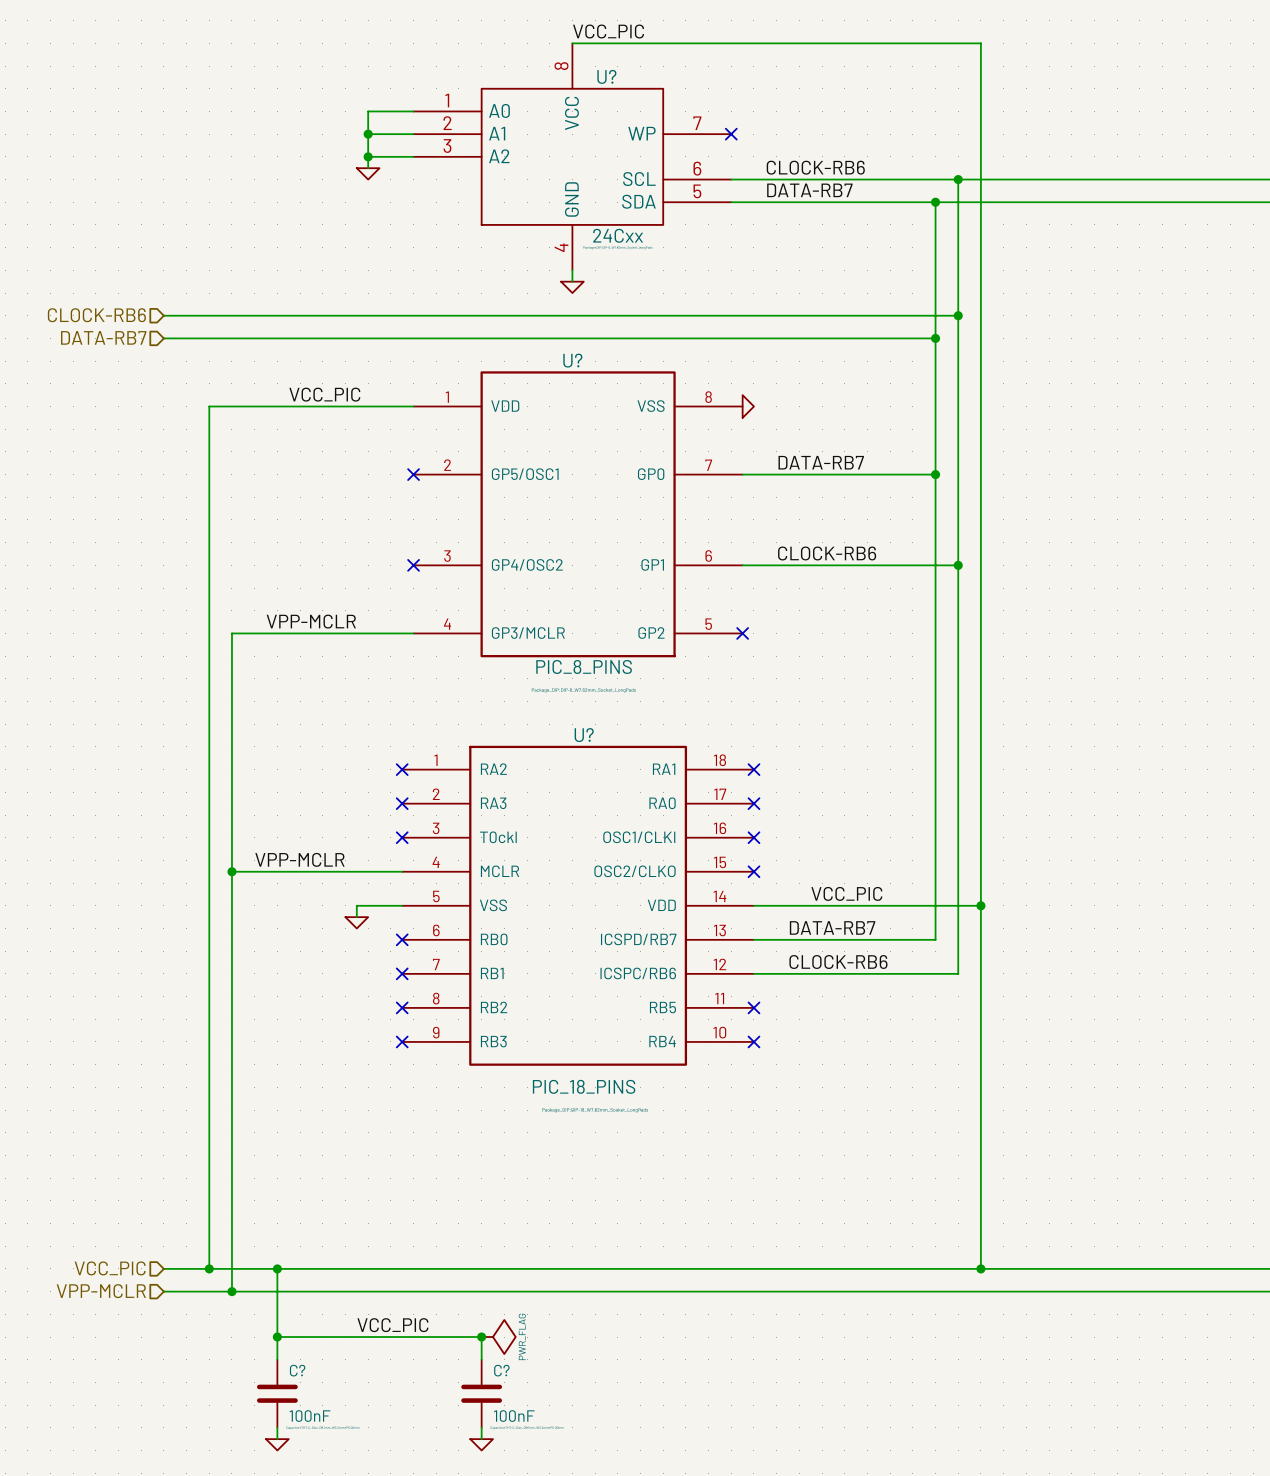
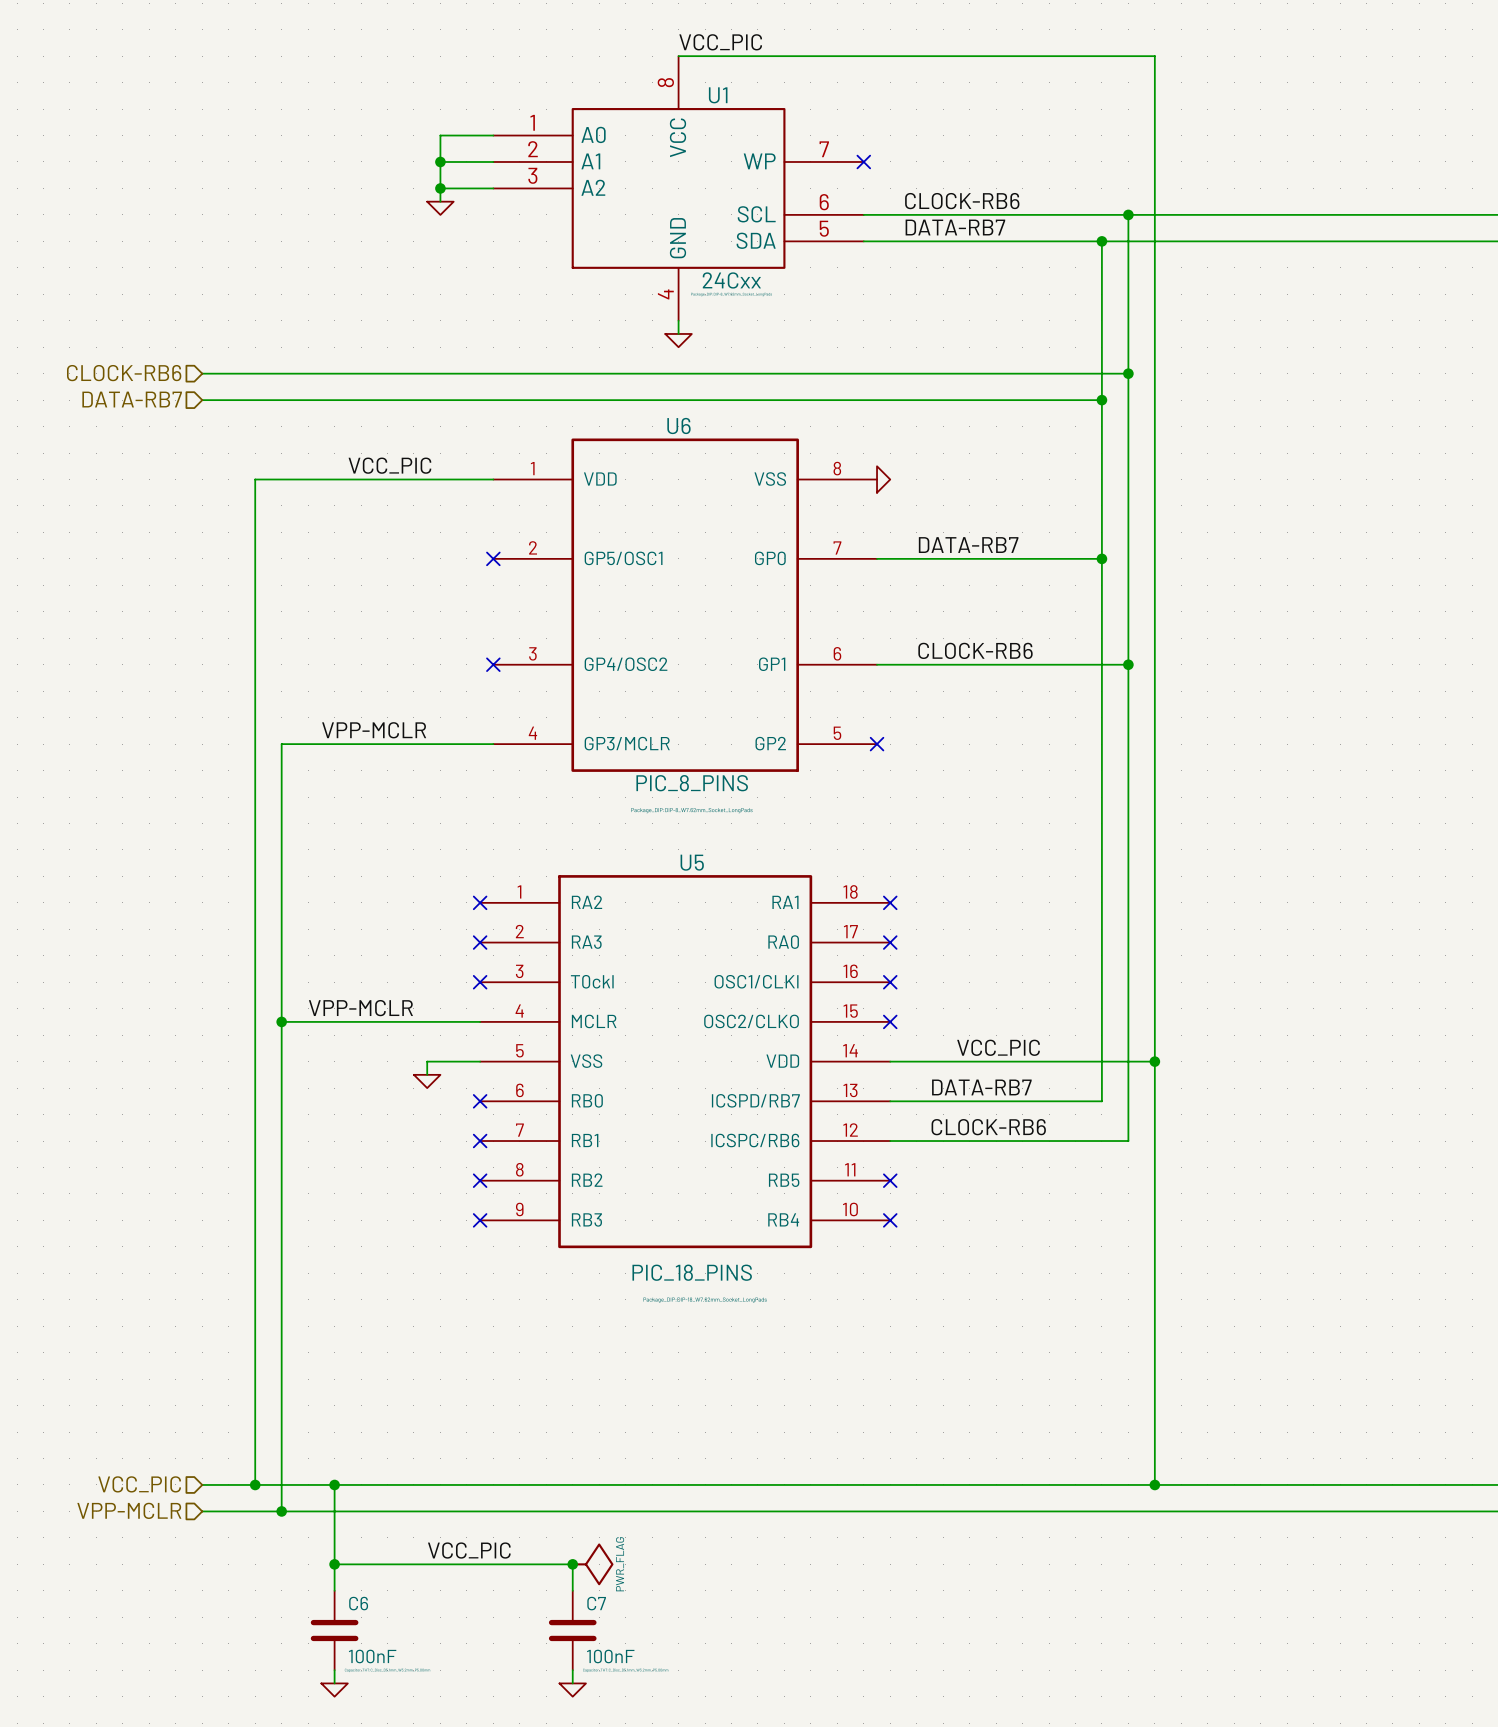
U? name: U? (606, 76) -> U1 (718, 95)
U? name: U? (572, 360) -> U6 (678, 425)
U? name: U? (584, 735) -> U5 (692, 862)
C? name: C? (297, 1370) -> C6 (358, 1603)
C? name: C? (501, 1370) -> C7 (596, 1603)

